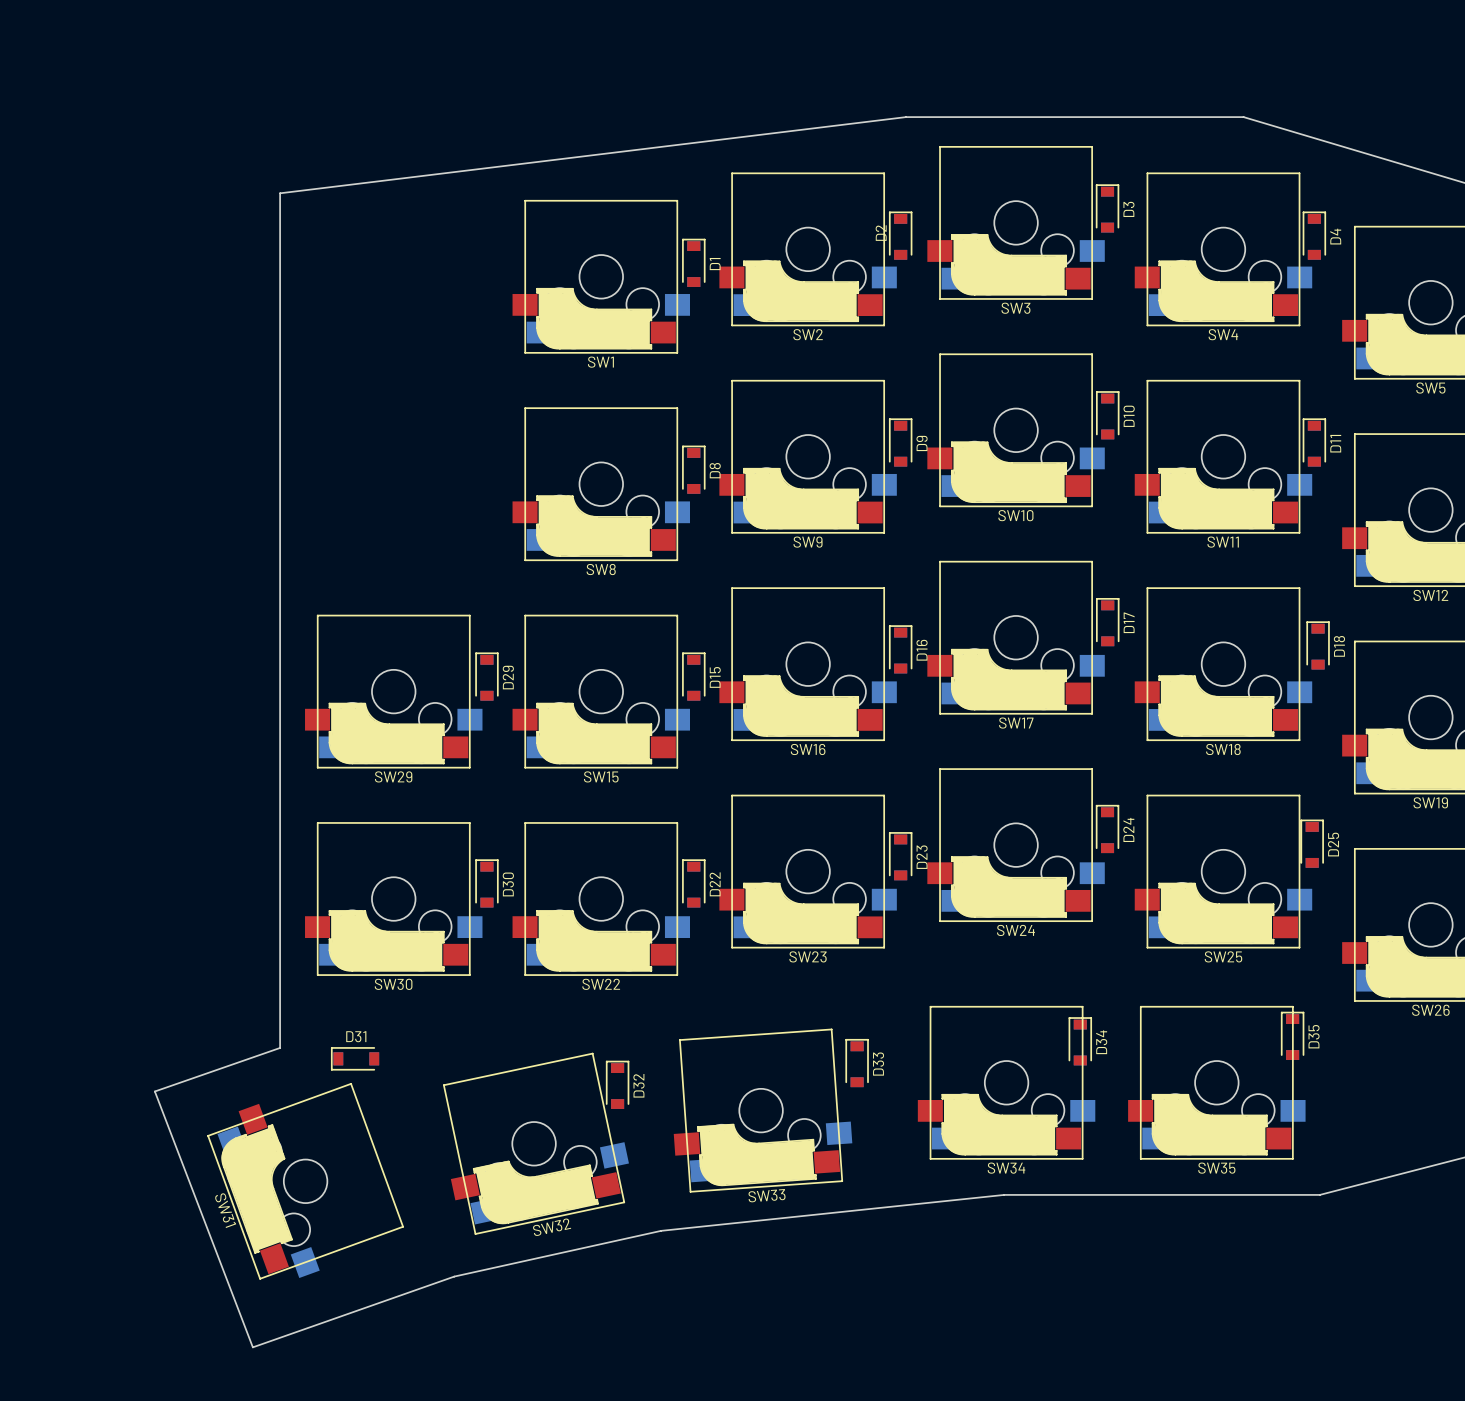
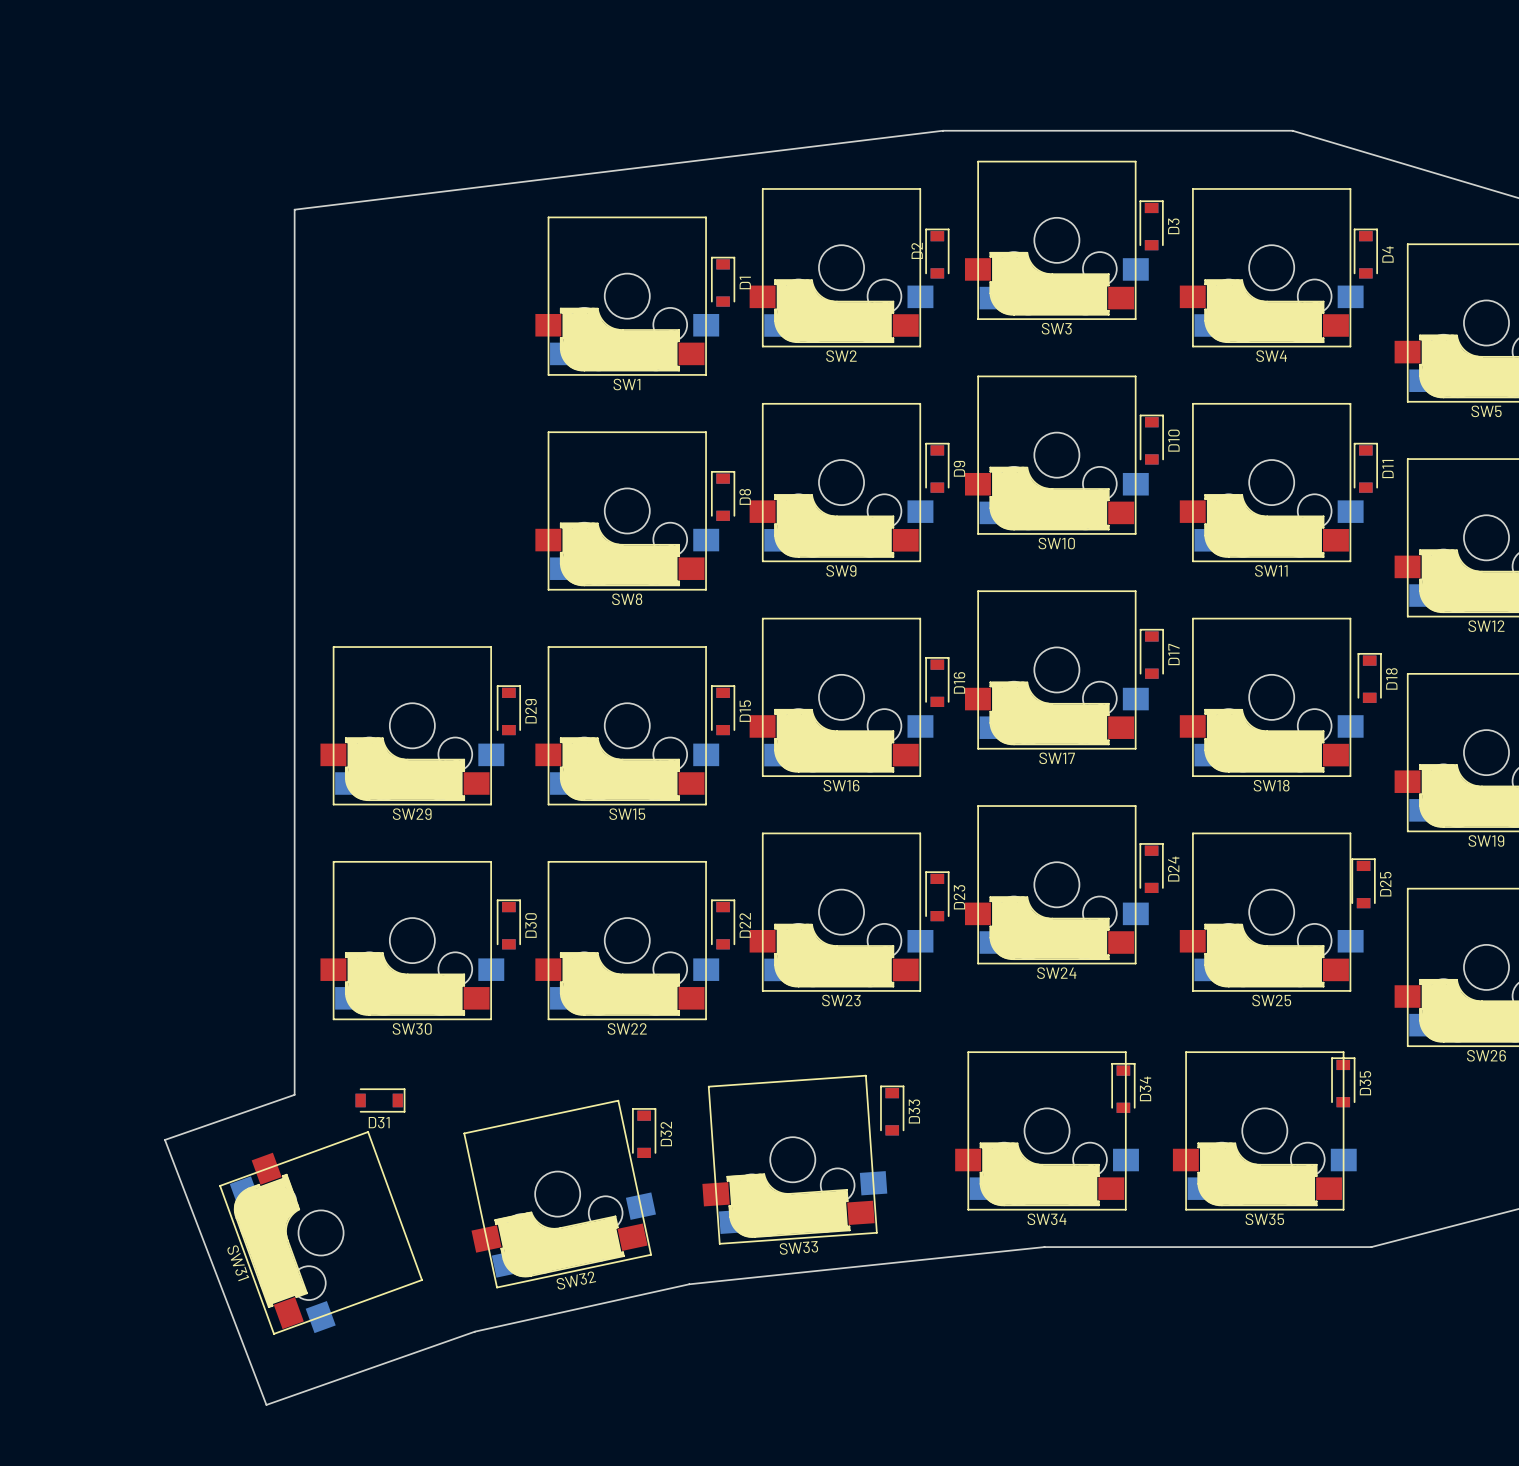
D31 rotation: 0° (355, 1058) -> 180° (380, 1100)

